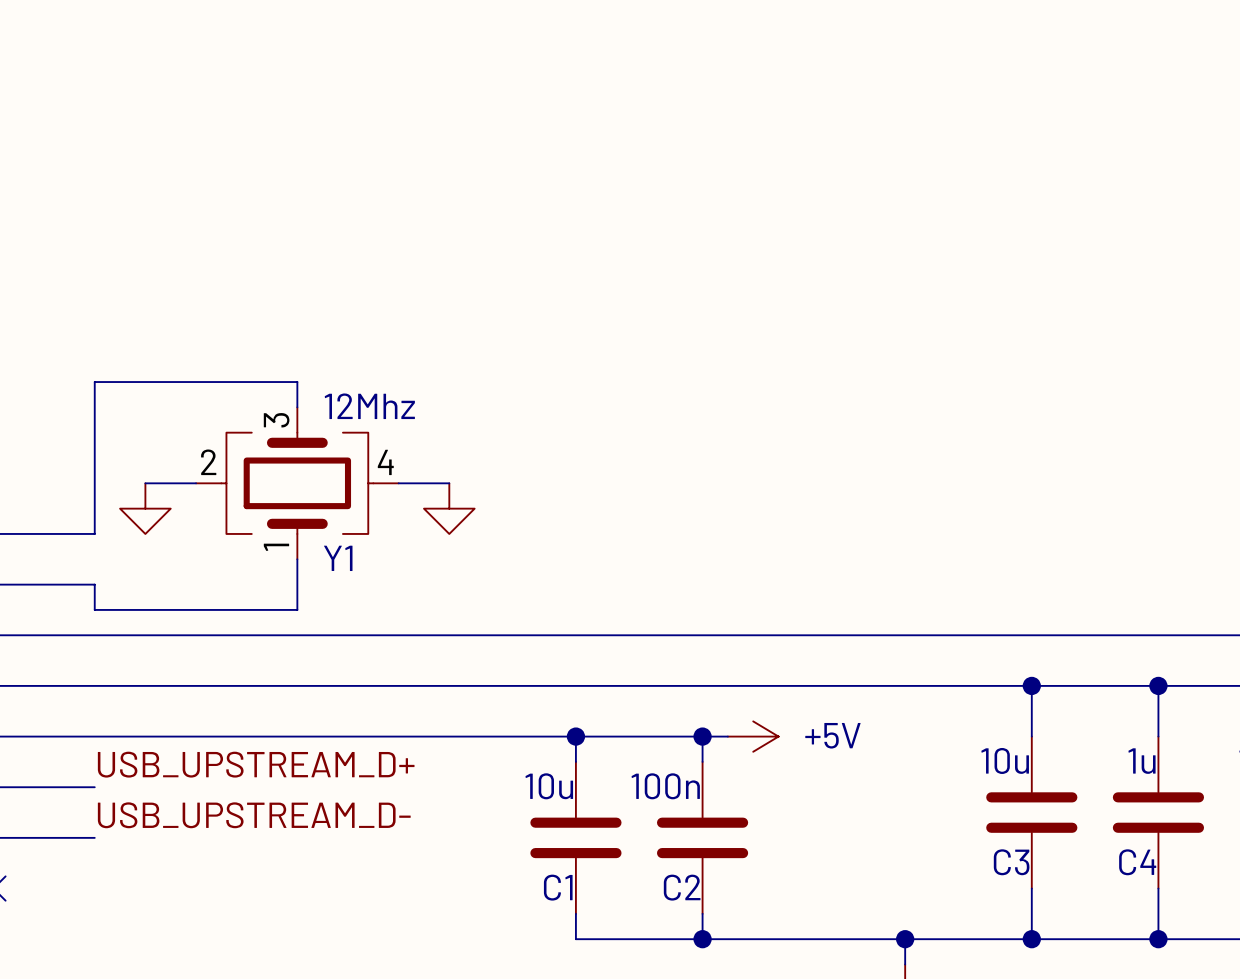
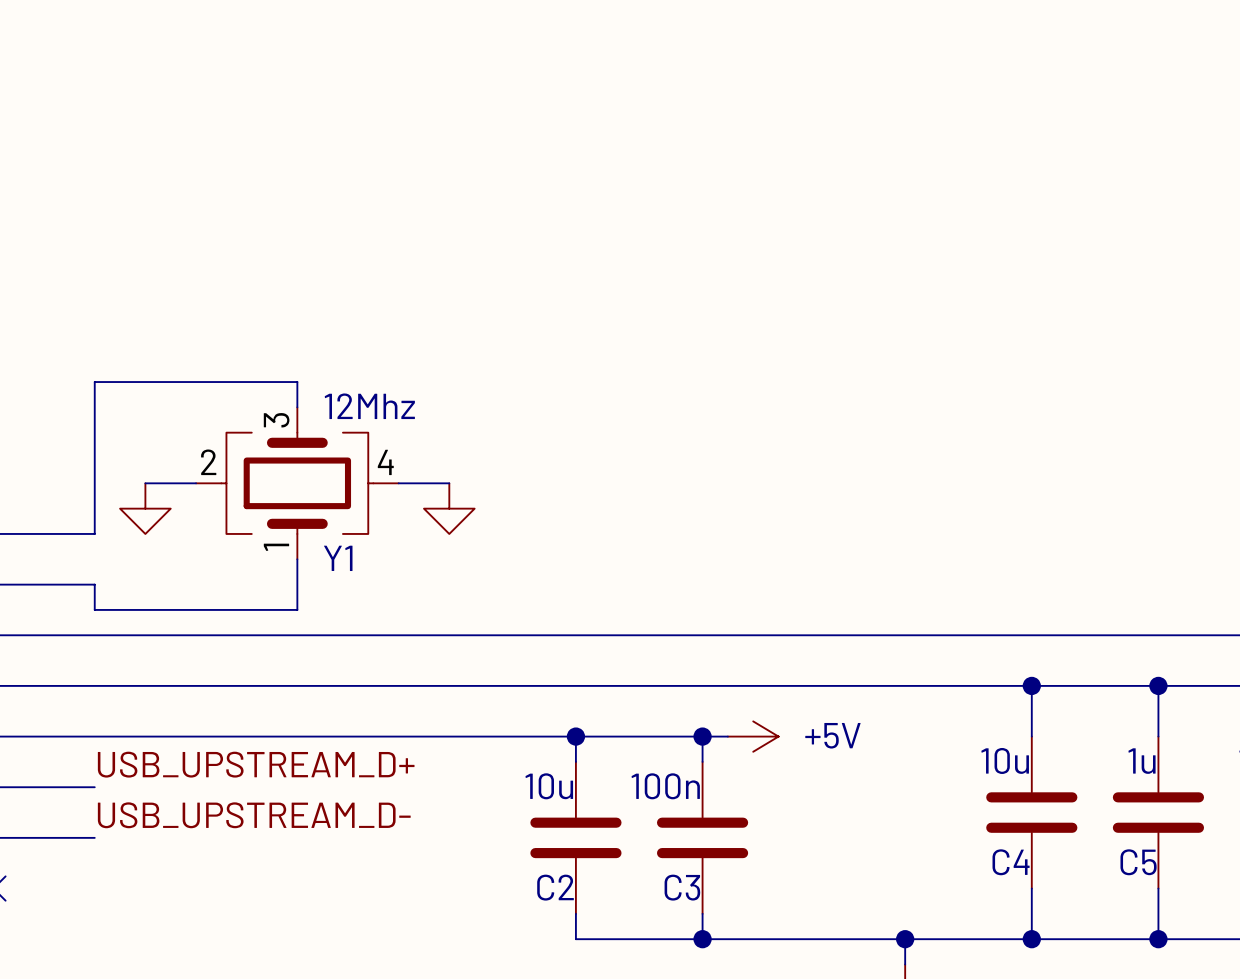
C3 name: C3 (1011, 862) -> C4 (1011, 862)
C4 name: C4 (1137, 862) -> C5 (1138, 862)
C1 name: C1 (558, 887) -> C2 (555, 887)
C2 name: C2 (682, 887) -> C3 (682, 887)

